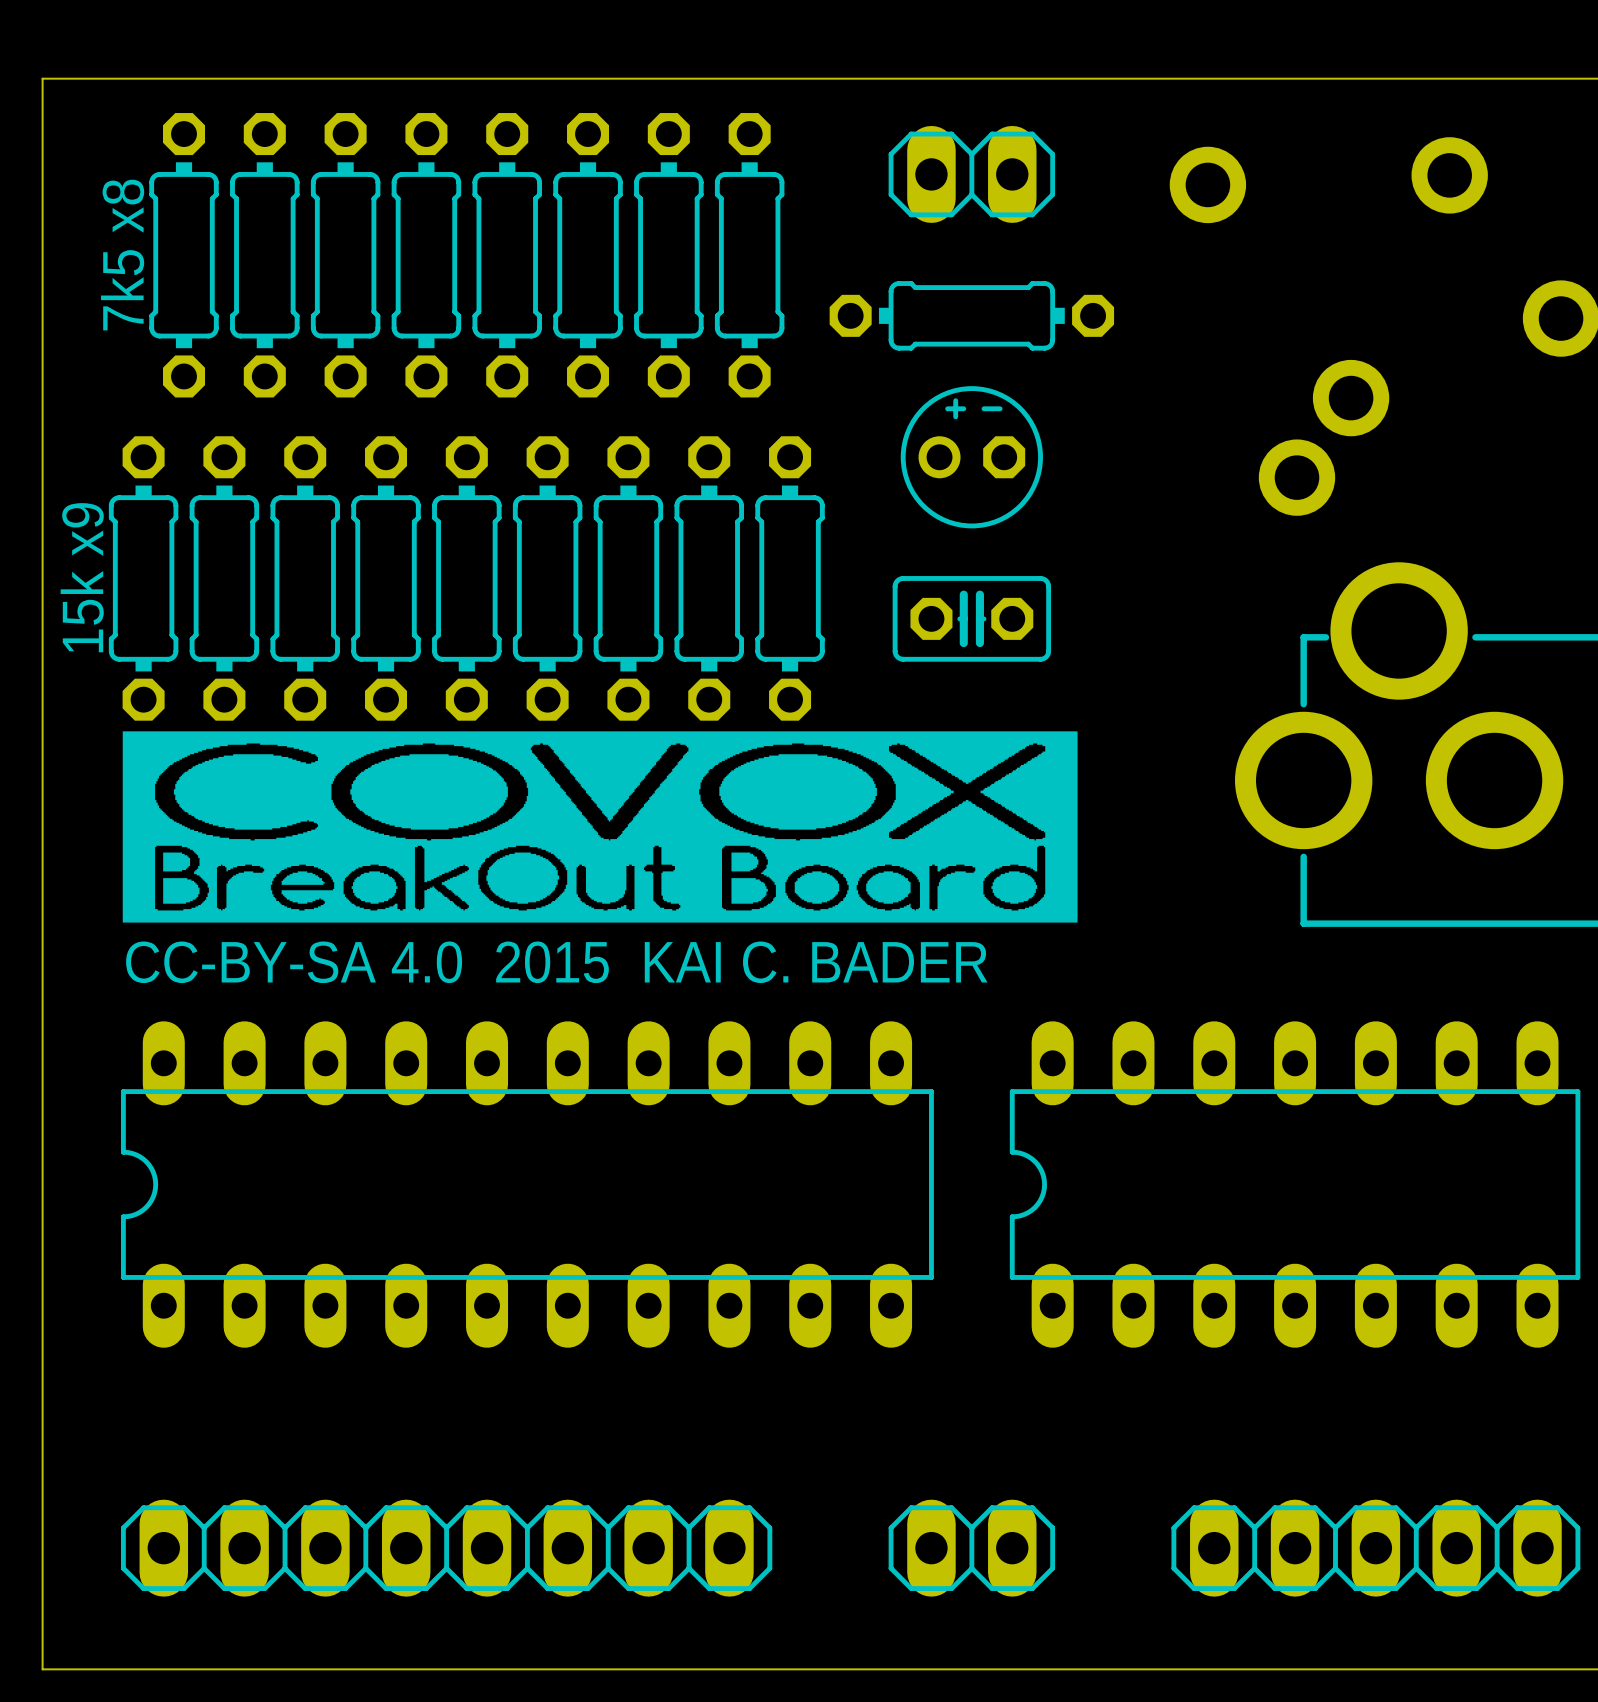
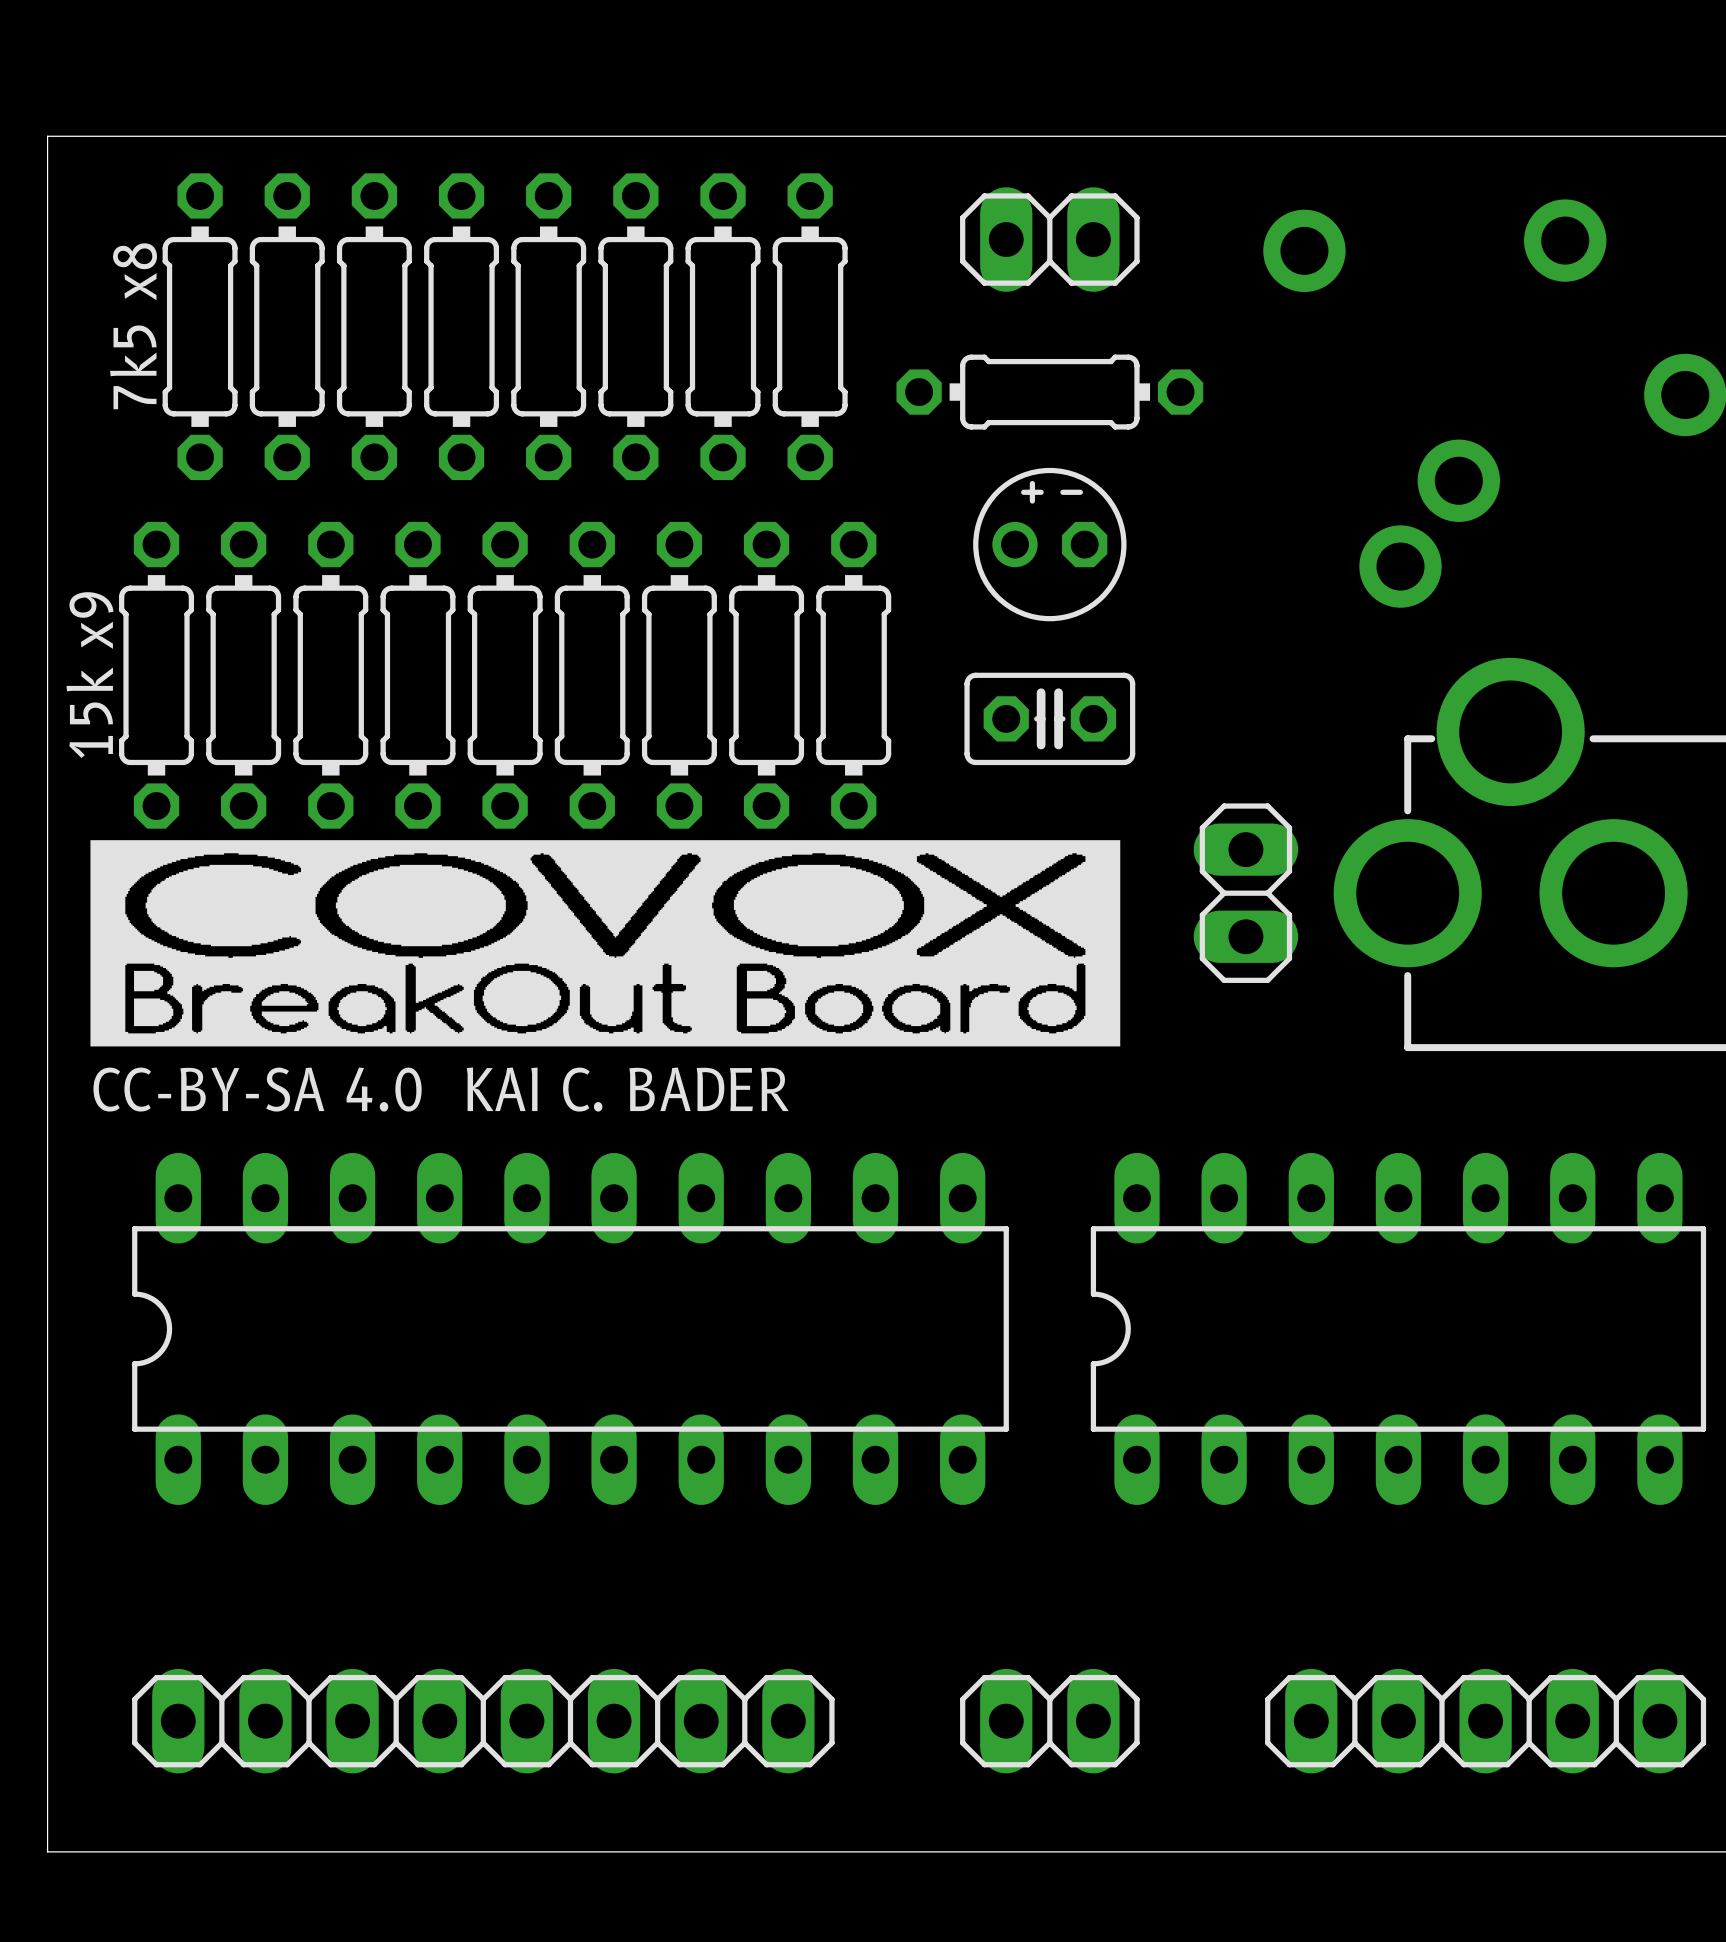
part: none -> (1245, 893)
drawing position: (600, 826) -> (605, 943)
text: CC-BY-SA 4.0 2015 KAI C. BADER (556, 962) -> CC-BY-SA 4.0 KAI C. BADER (441, 1089)

